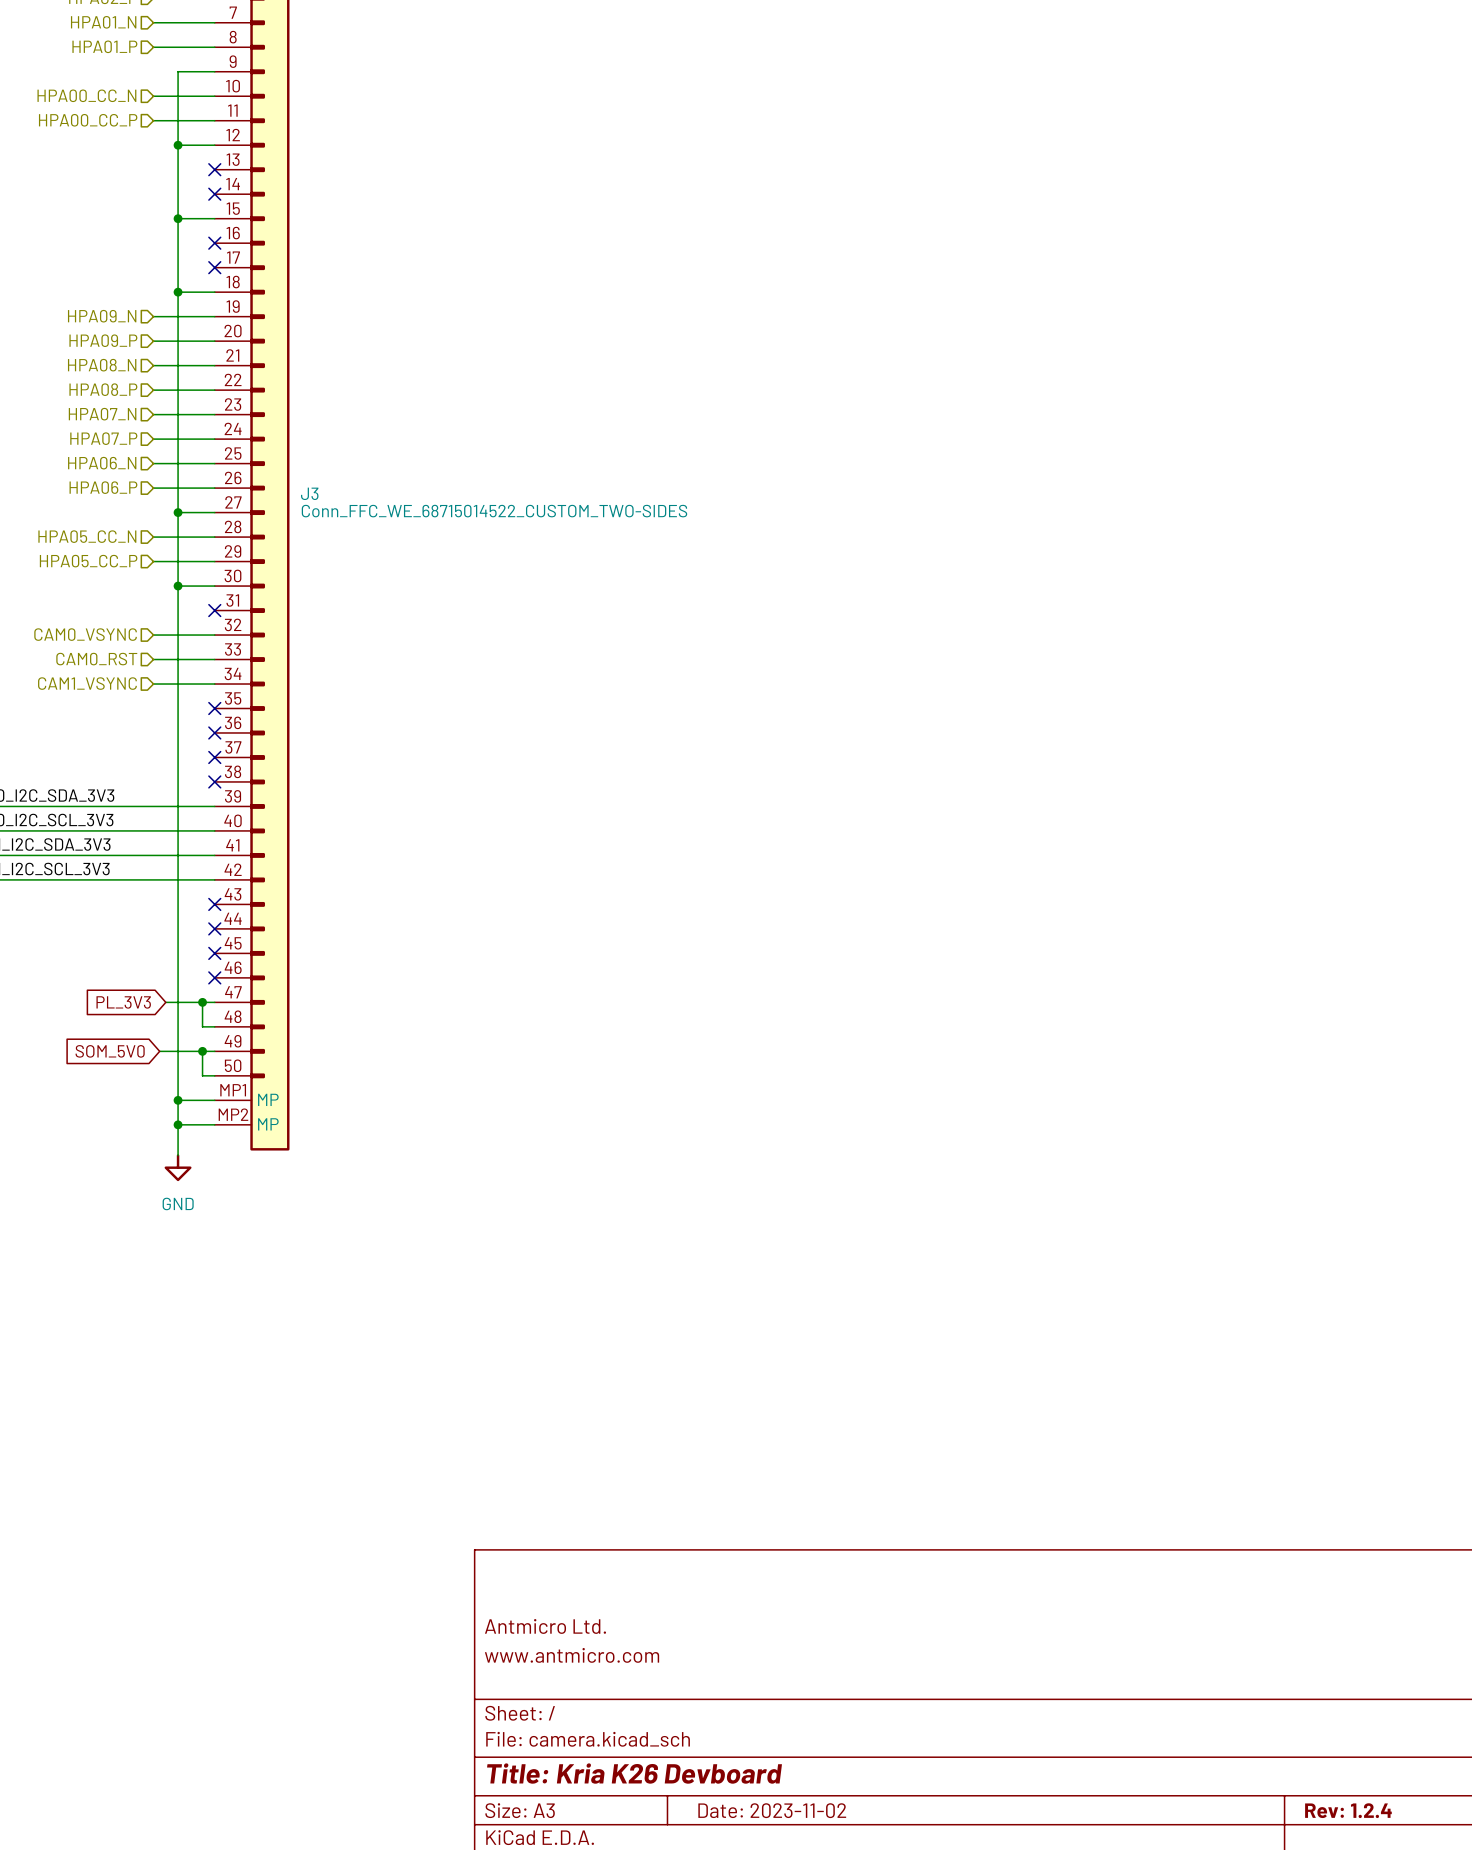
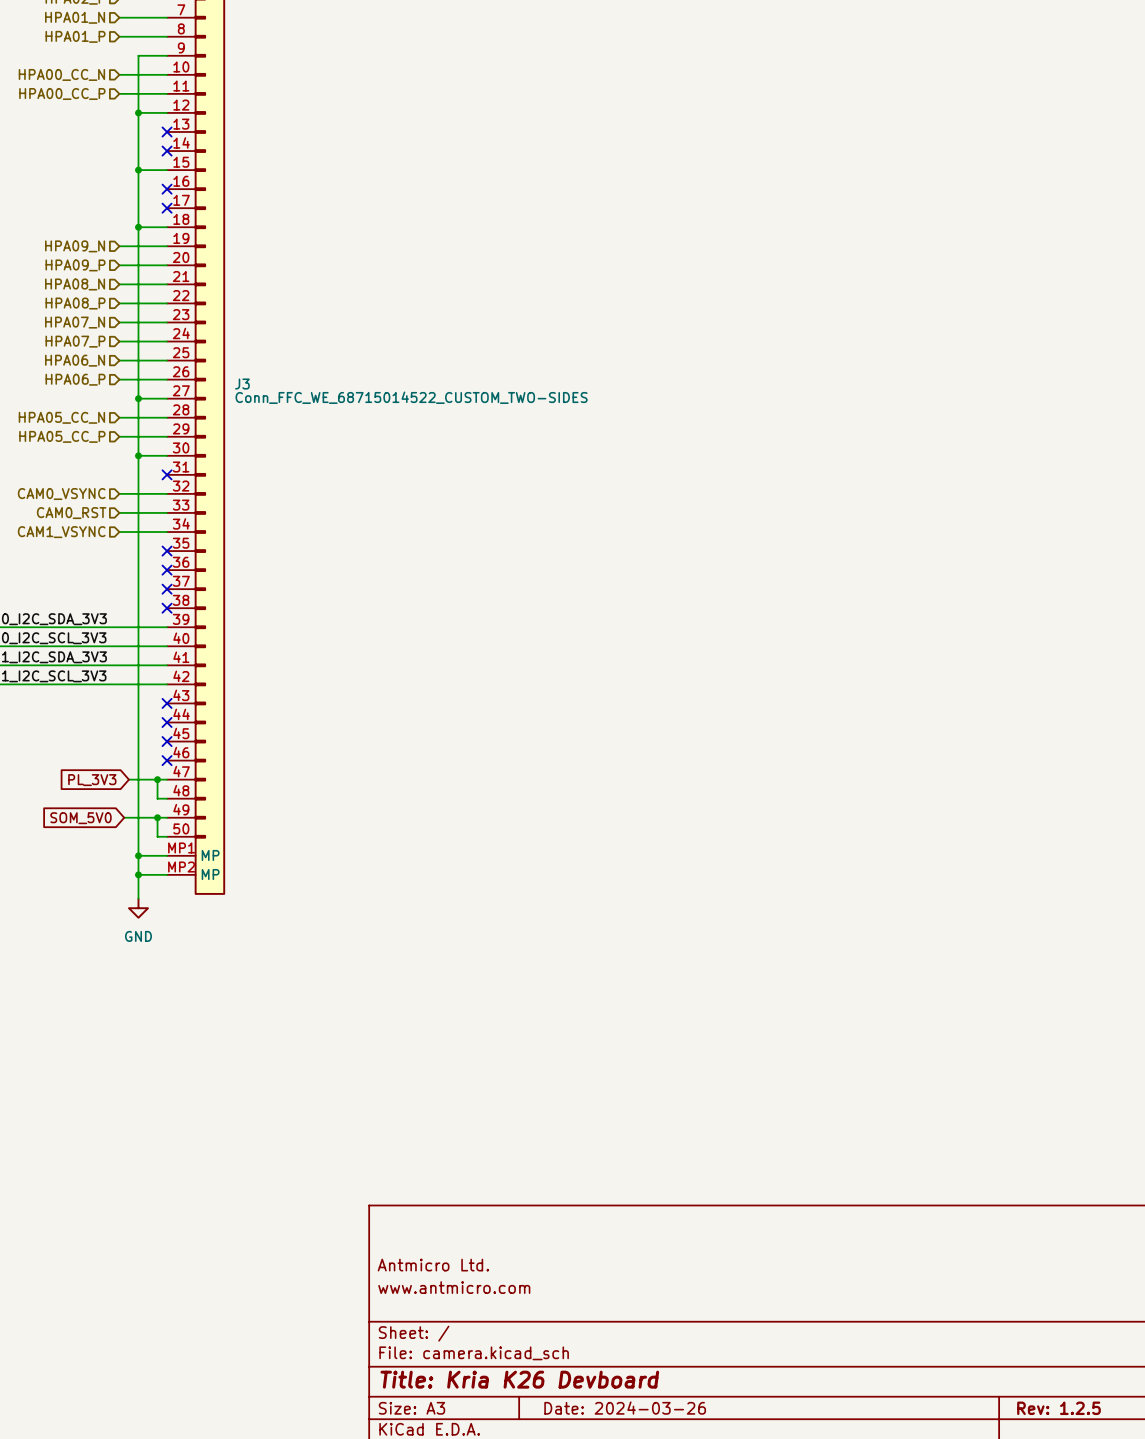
title block: Date: 2023-11-02 (772, 1810) -> Date: 2024-03-26 (625, 1408)
title block: Rev: 1.2.4 (1348, 1810) -> Rev: 1.2.5 (1058, 1408)

